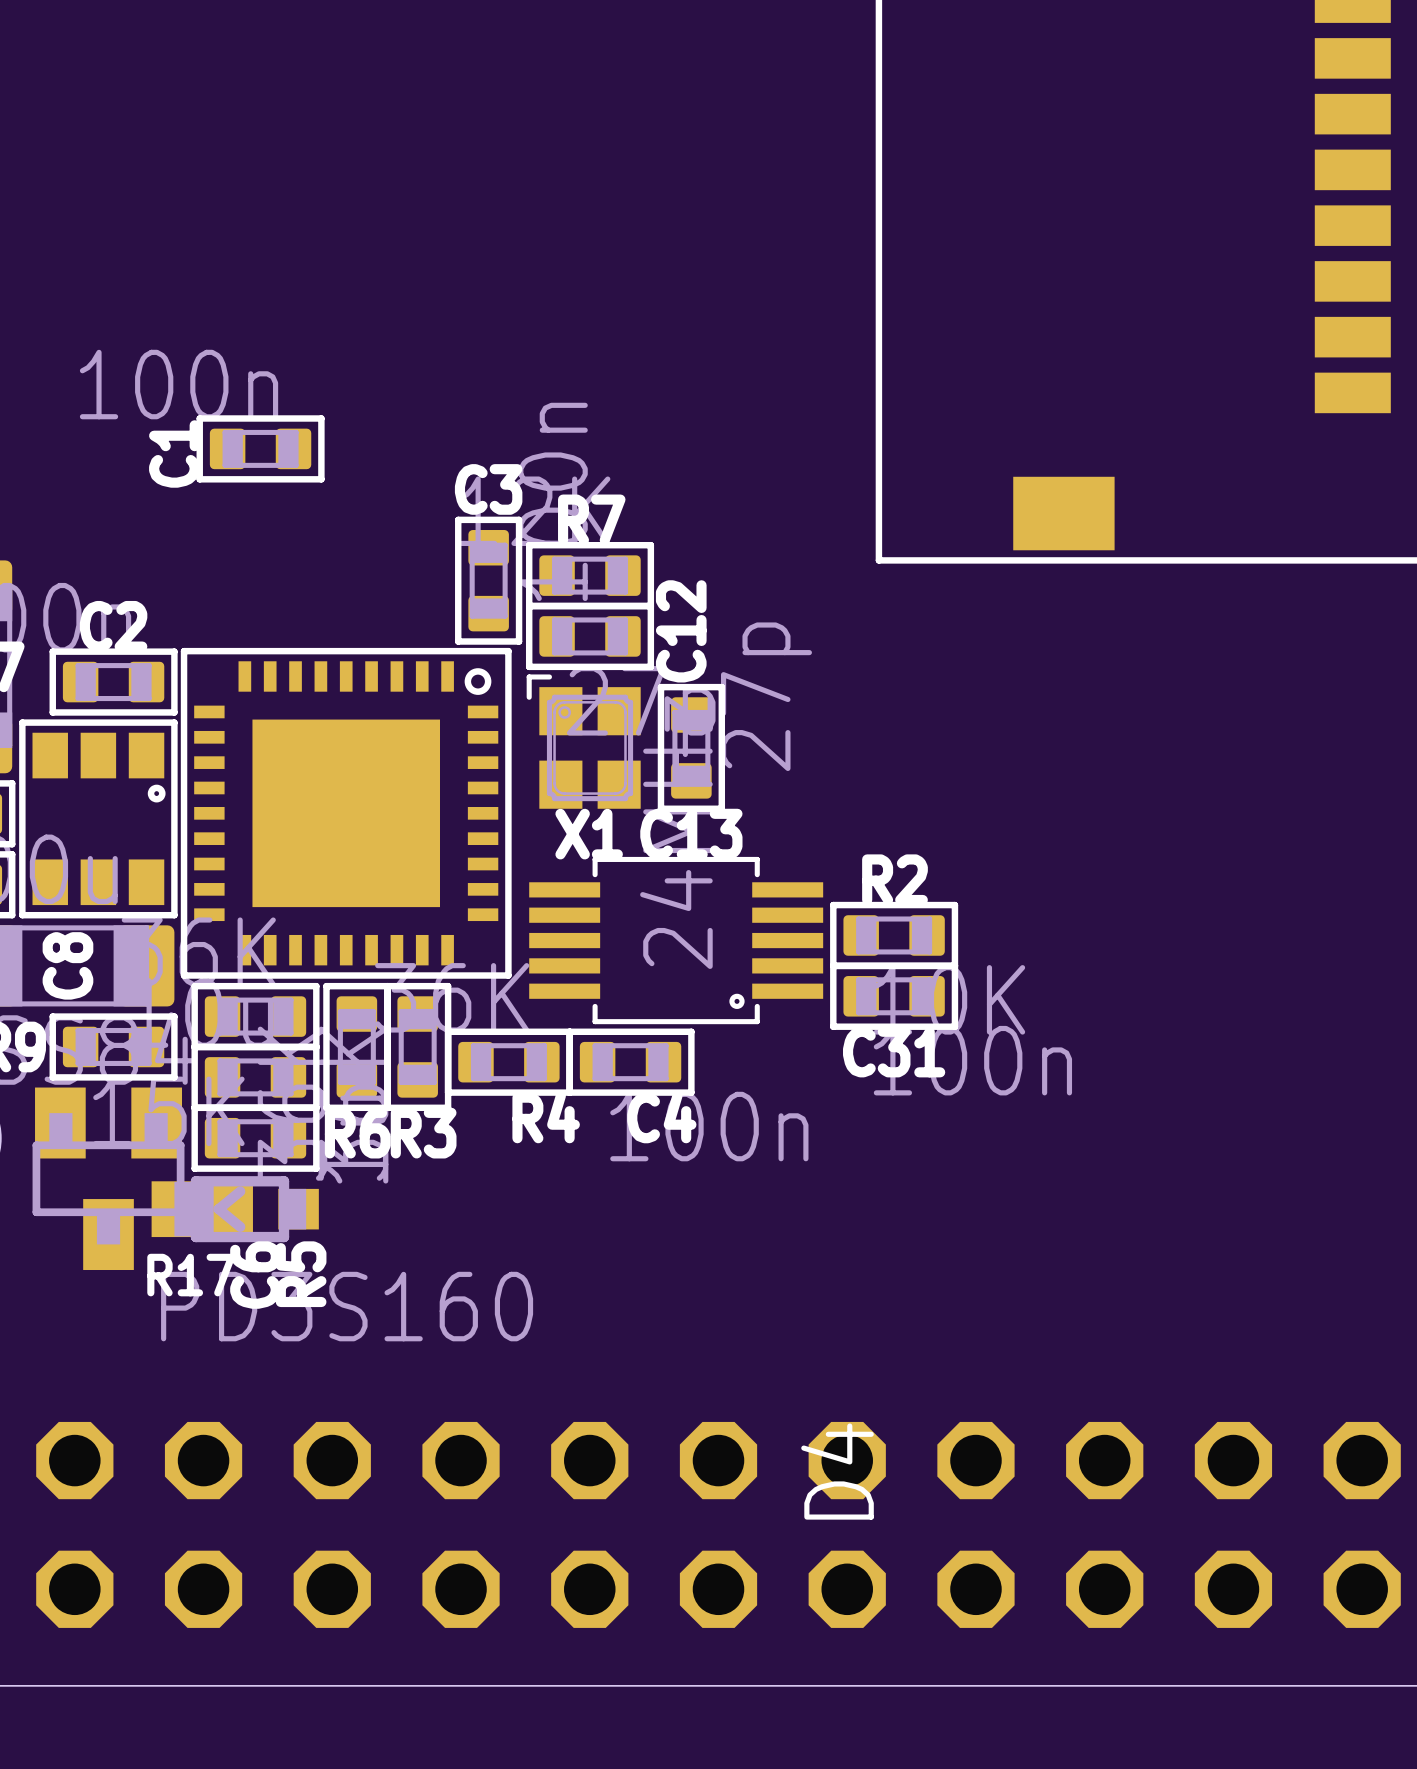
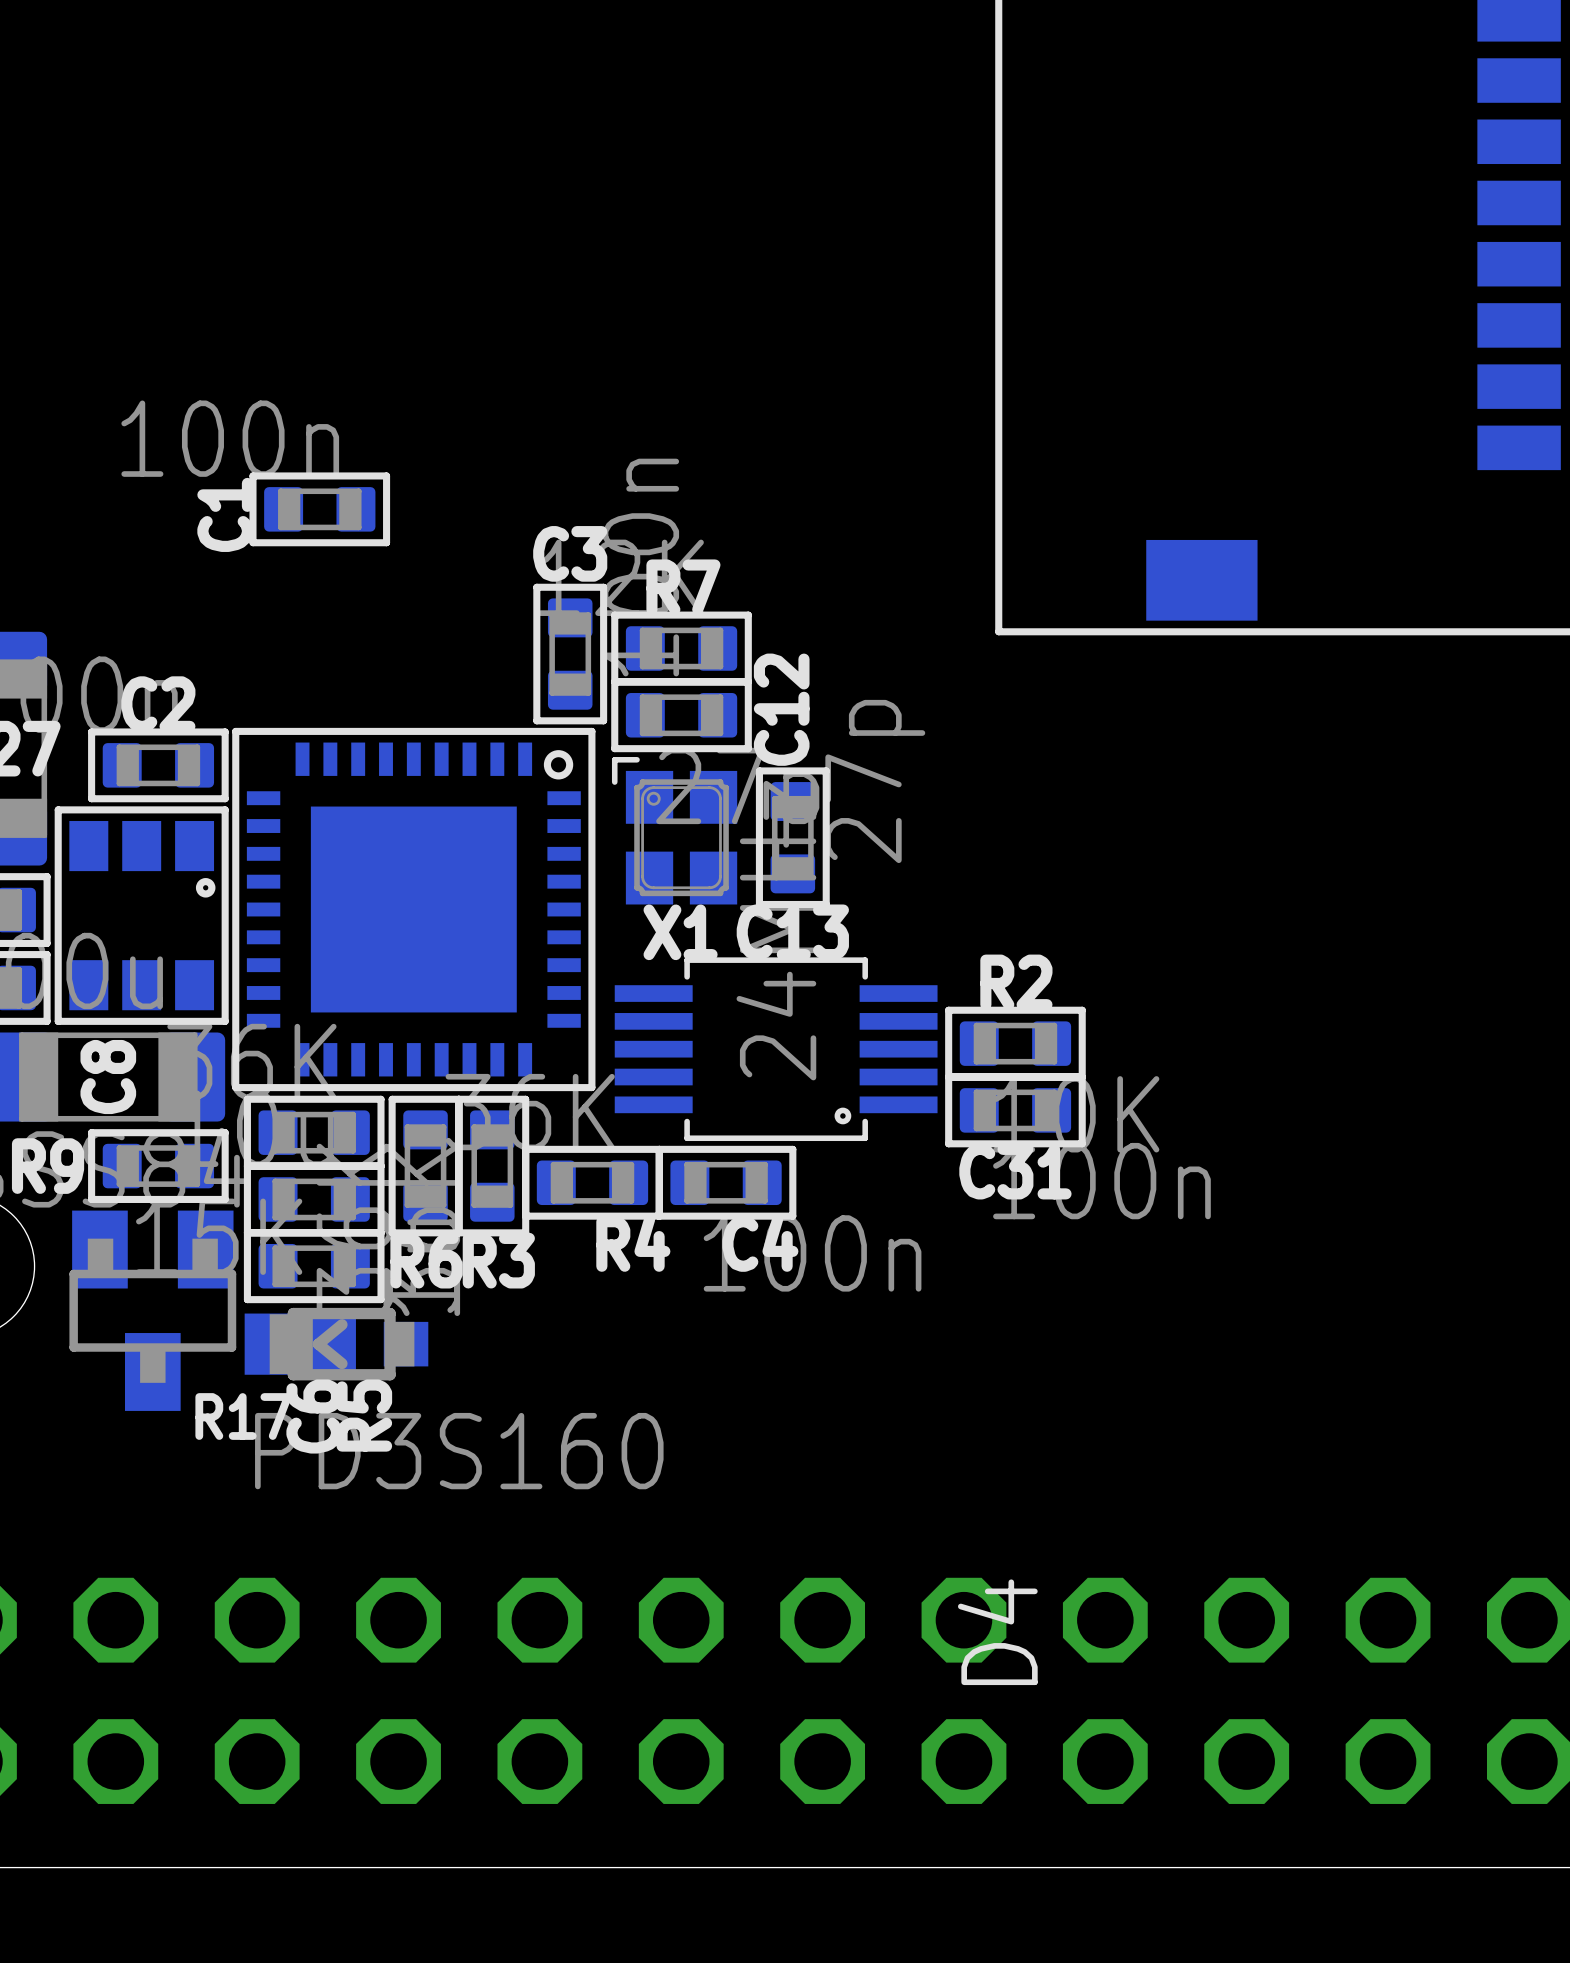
D4 position: (235, 1209) -> (336, 1344)

